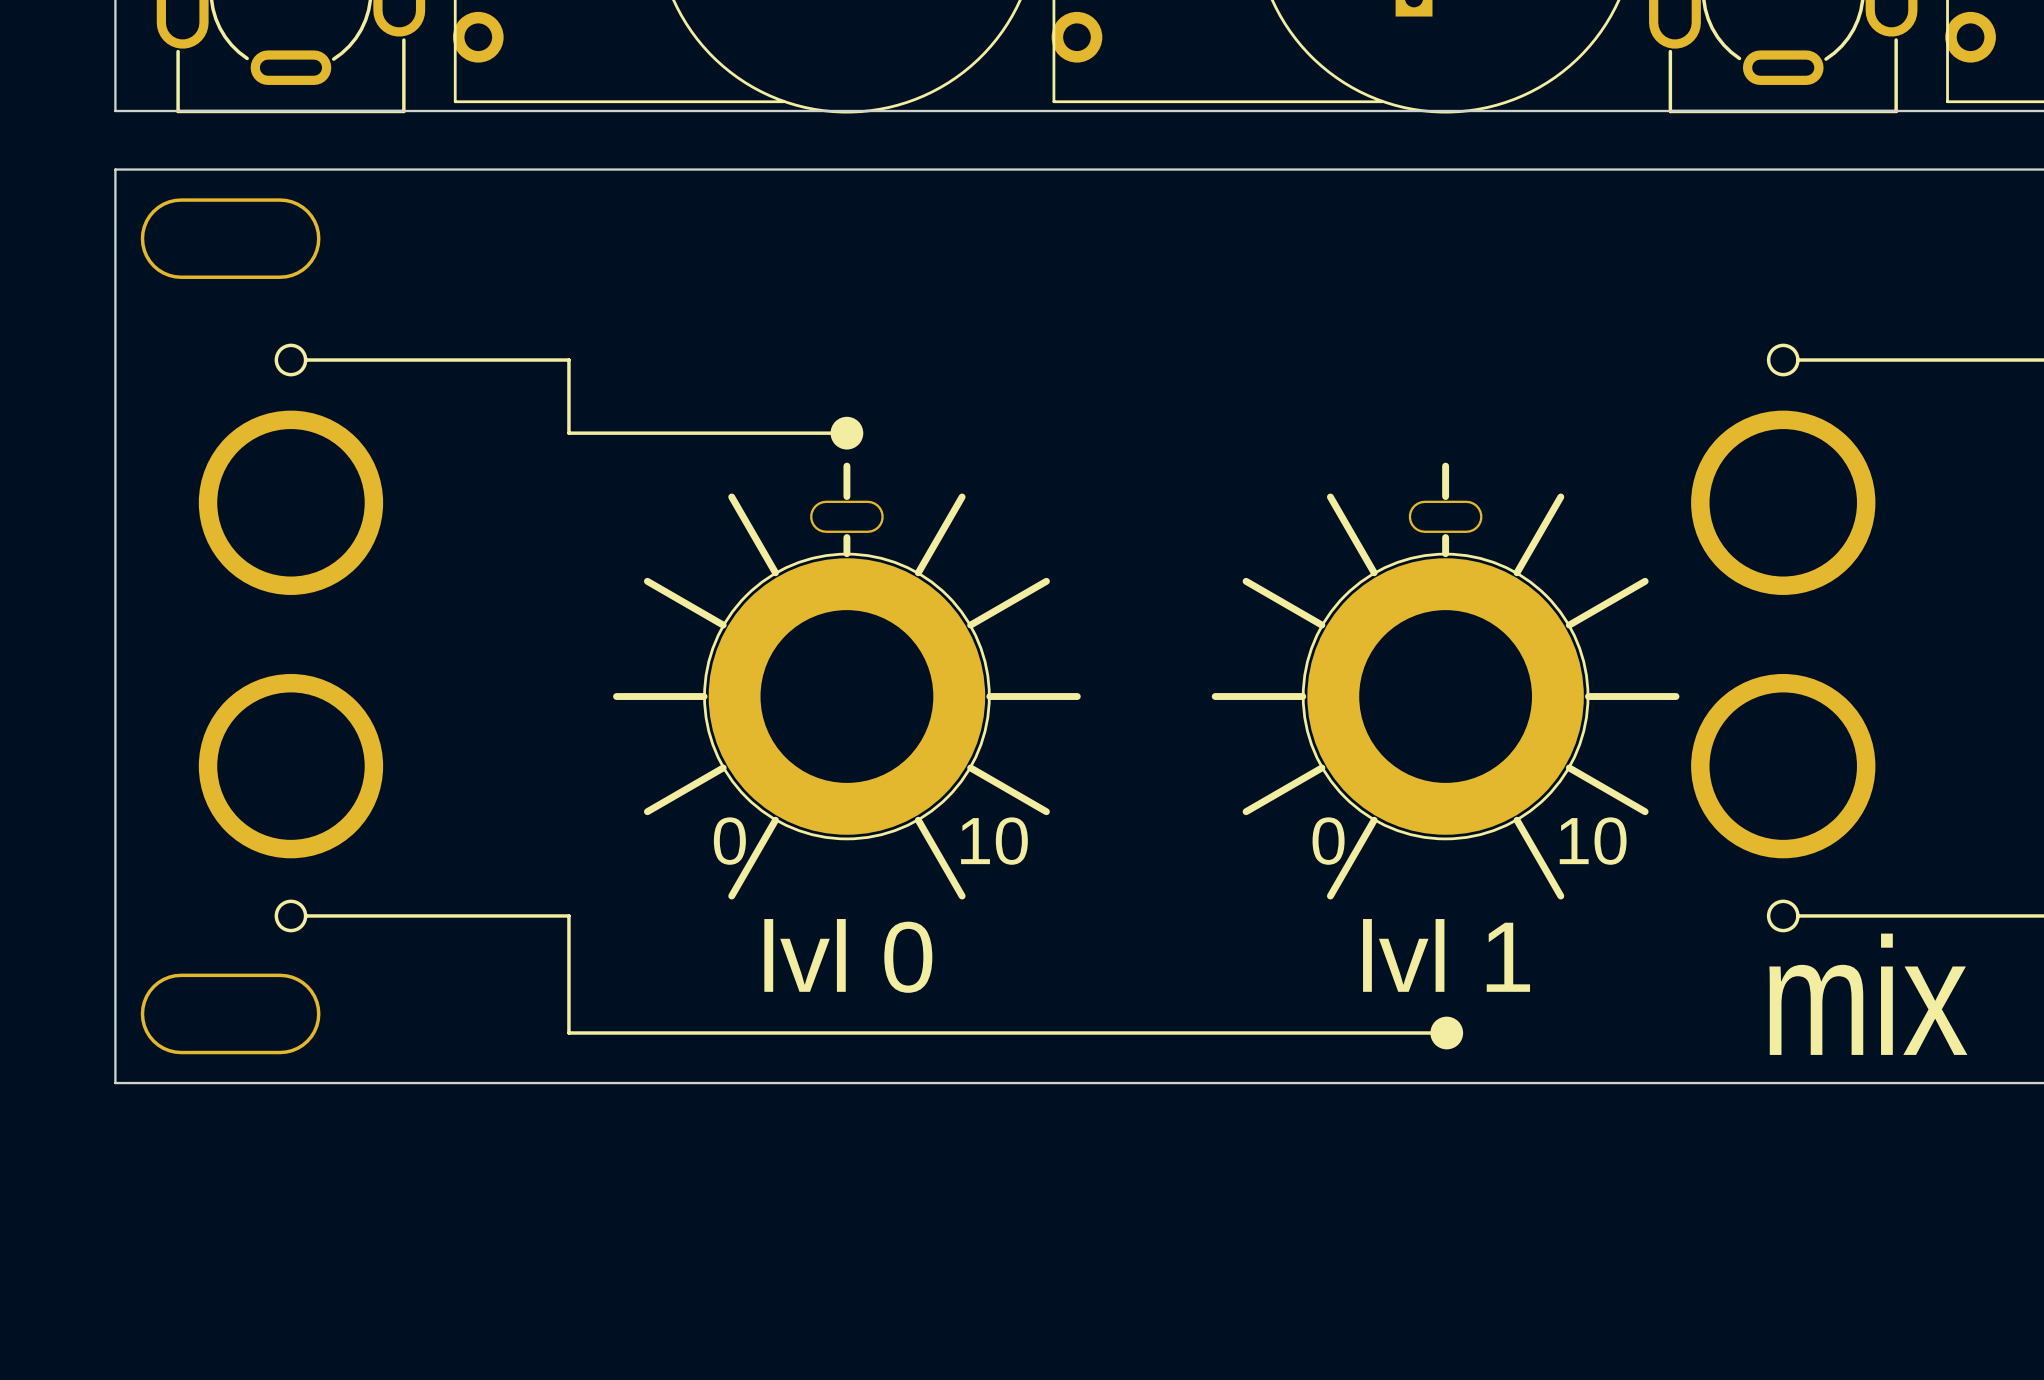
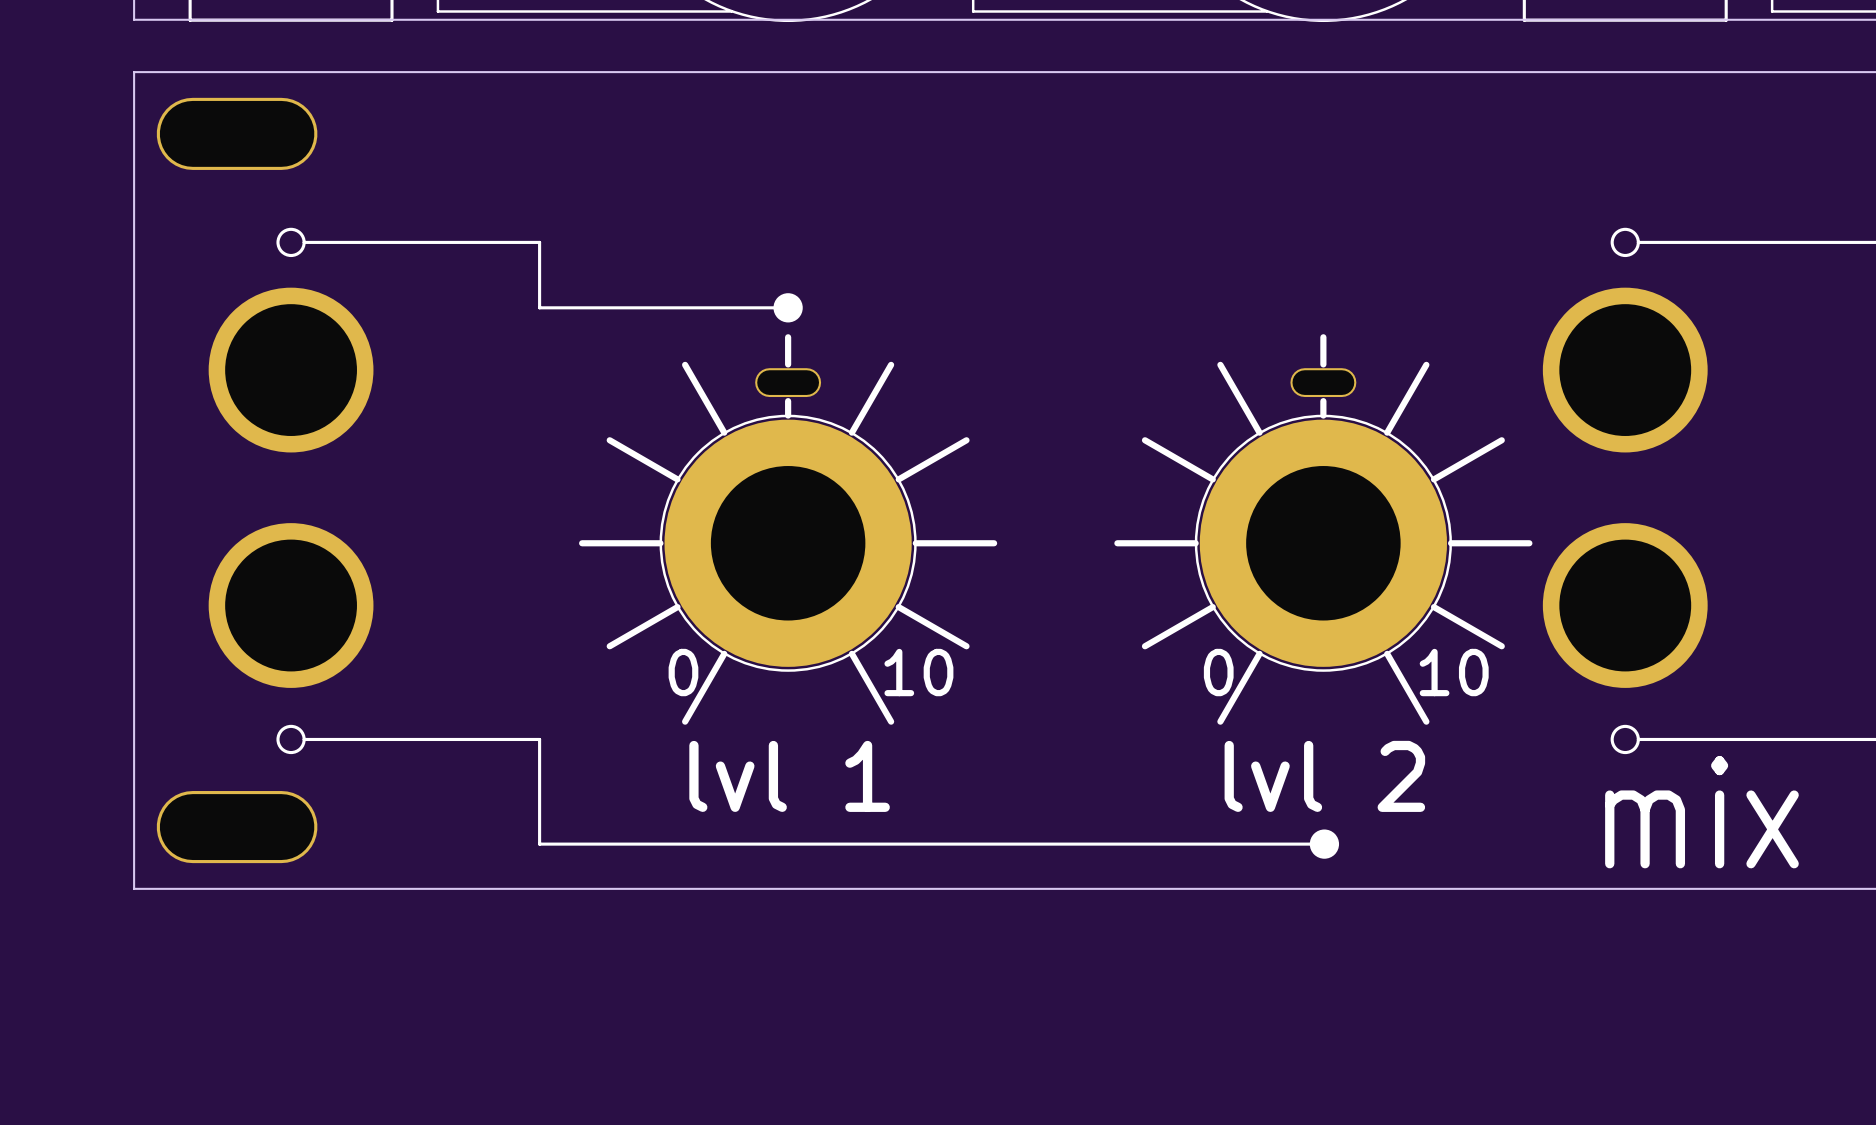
part value: lvl 0 (848, 955) -> lvl 1 (789, 776)
part value: lvl 1 (1446, 955) -> lvl 2 (1324, 776)

